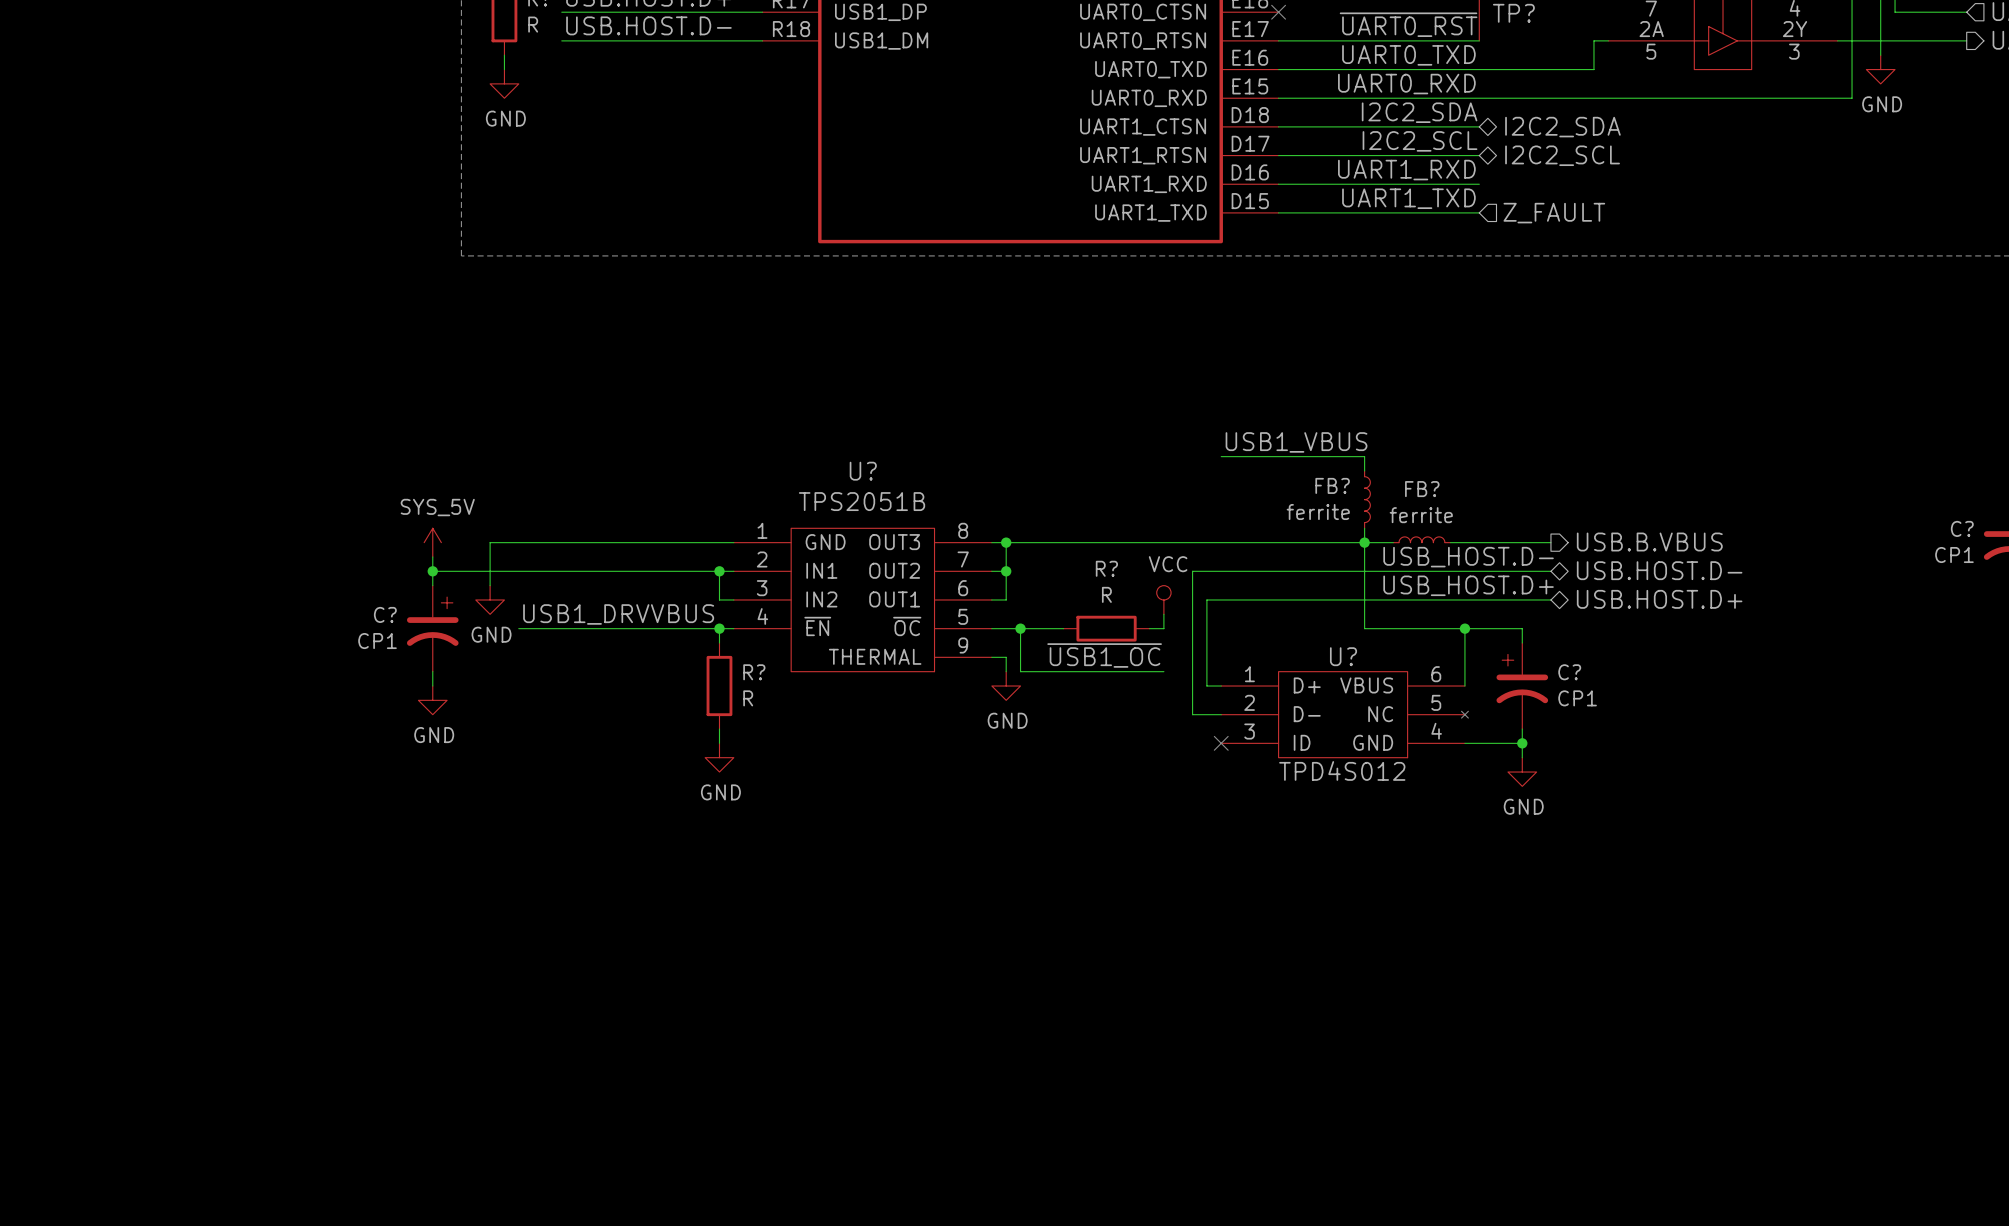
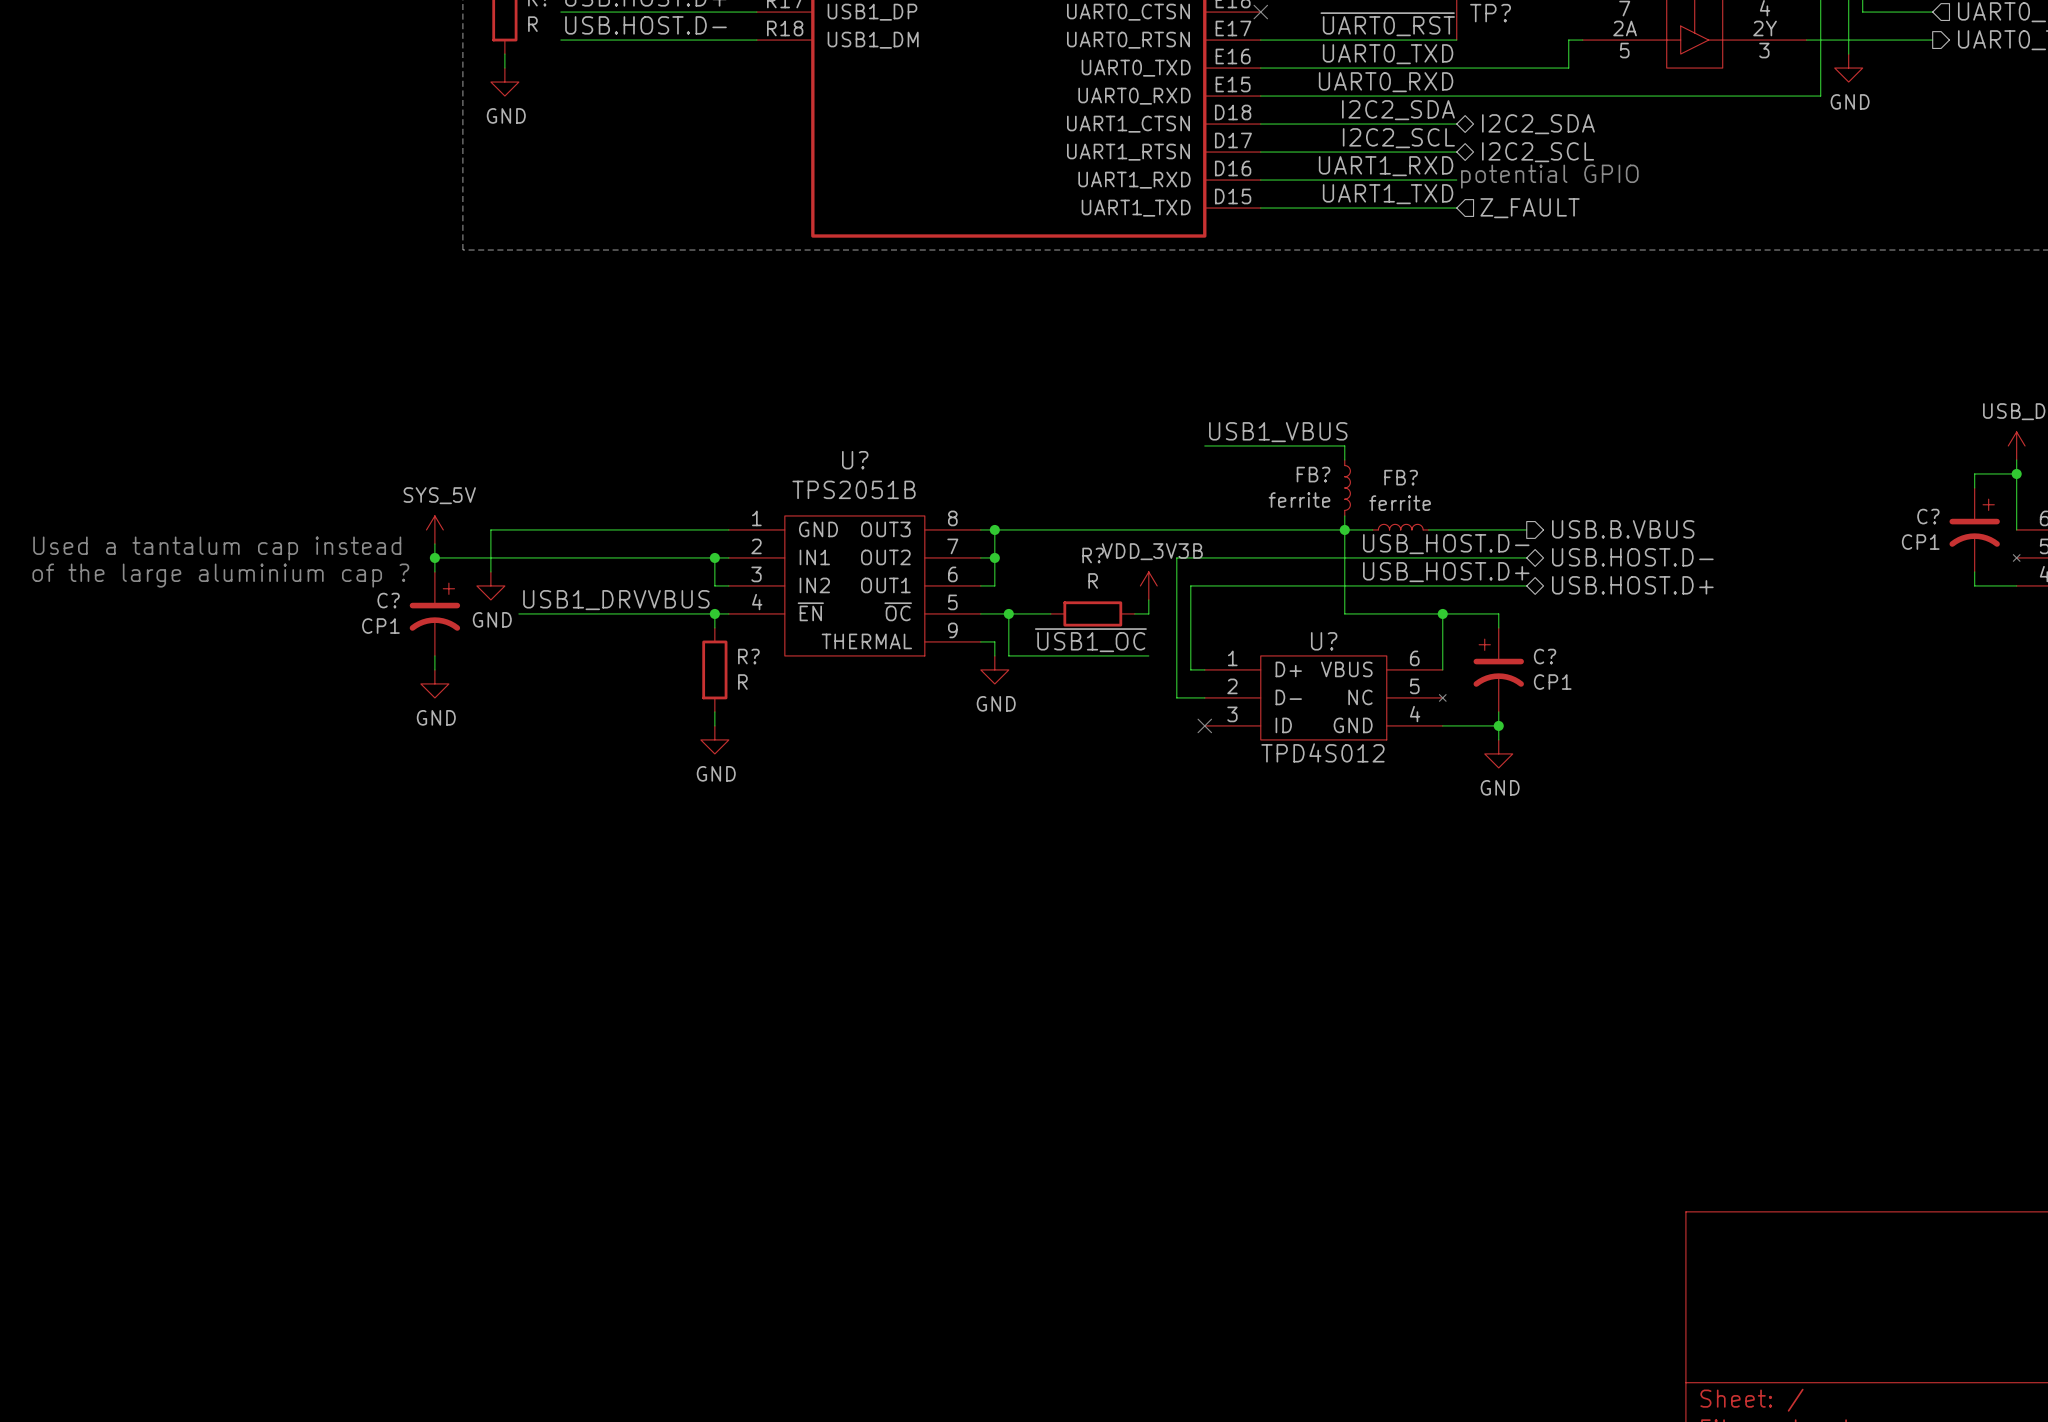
text: none -> potential GPIO (1549, 176)
text: none -> Used a tantalum cap instead (217, 548)
text: none -> of the large aluminium cap ? (220, 575)
power symbol: VCC (1163, 599) -> VDD_3V3B (1148, 585)

